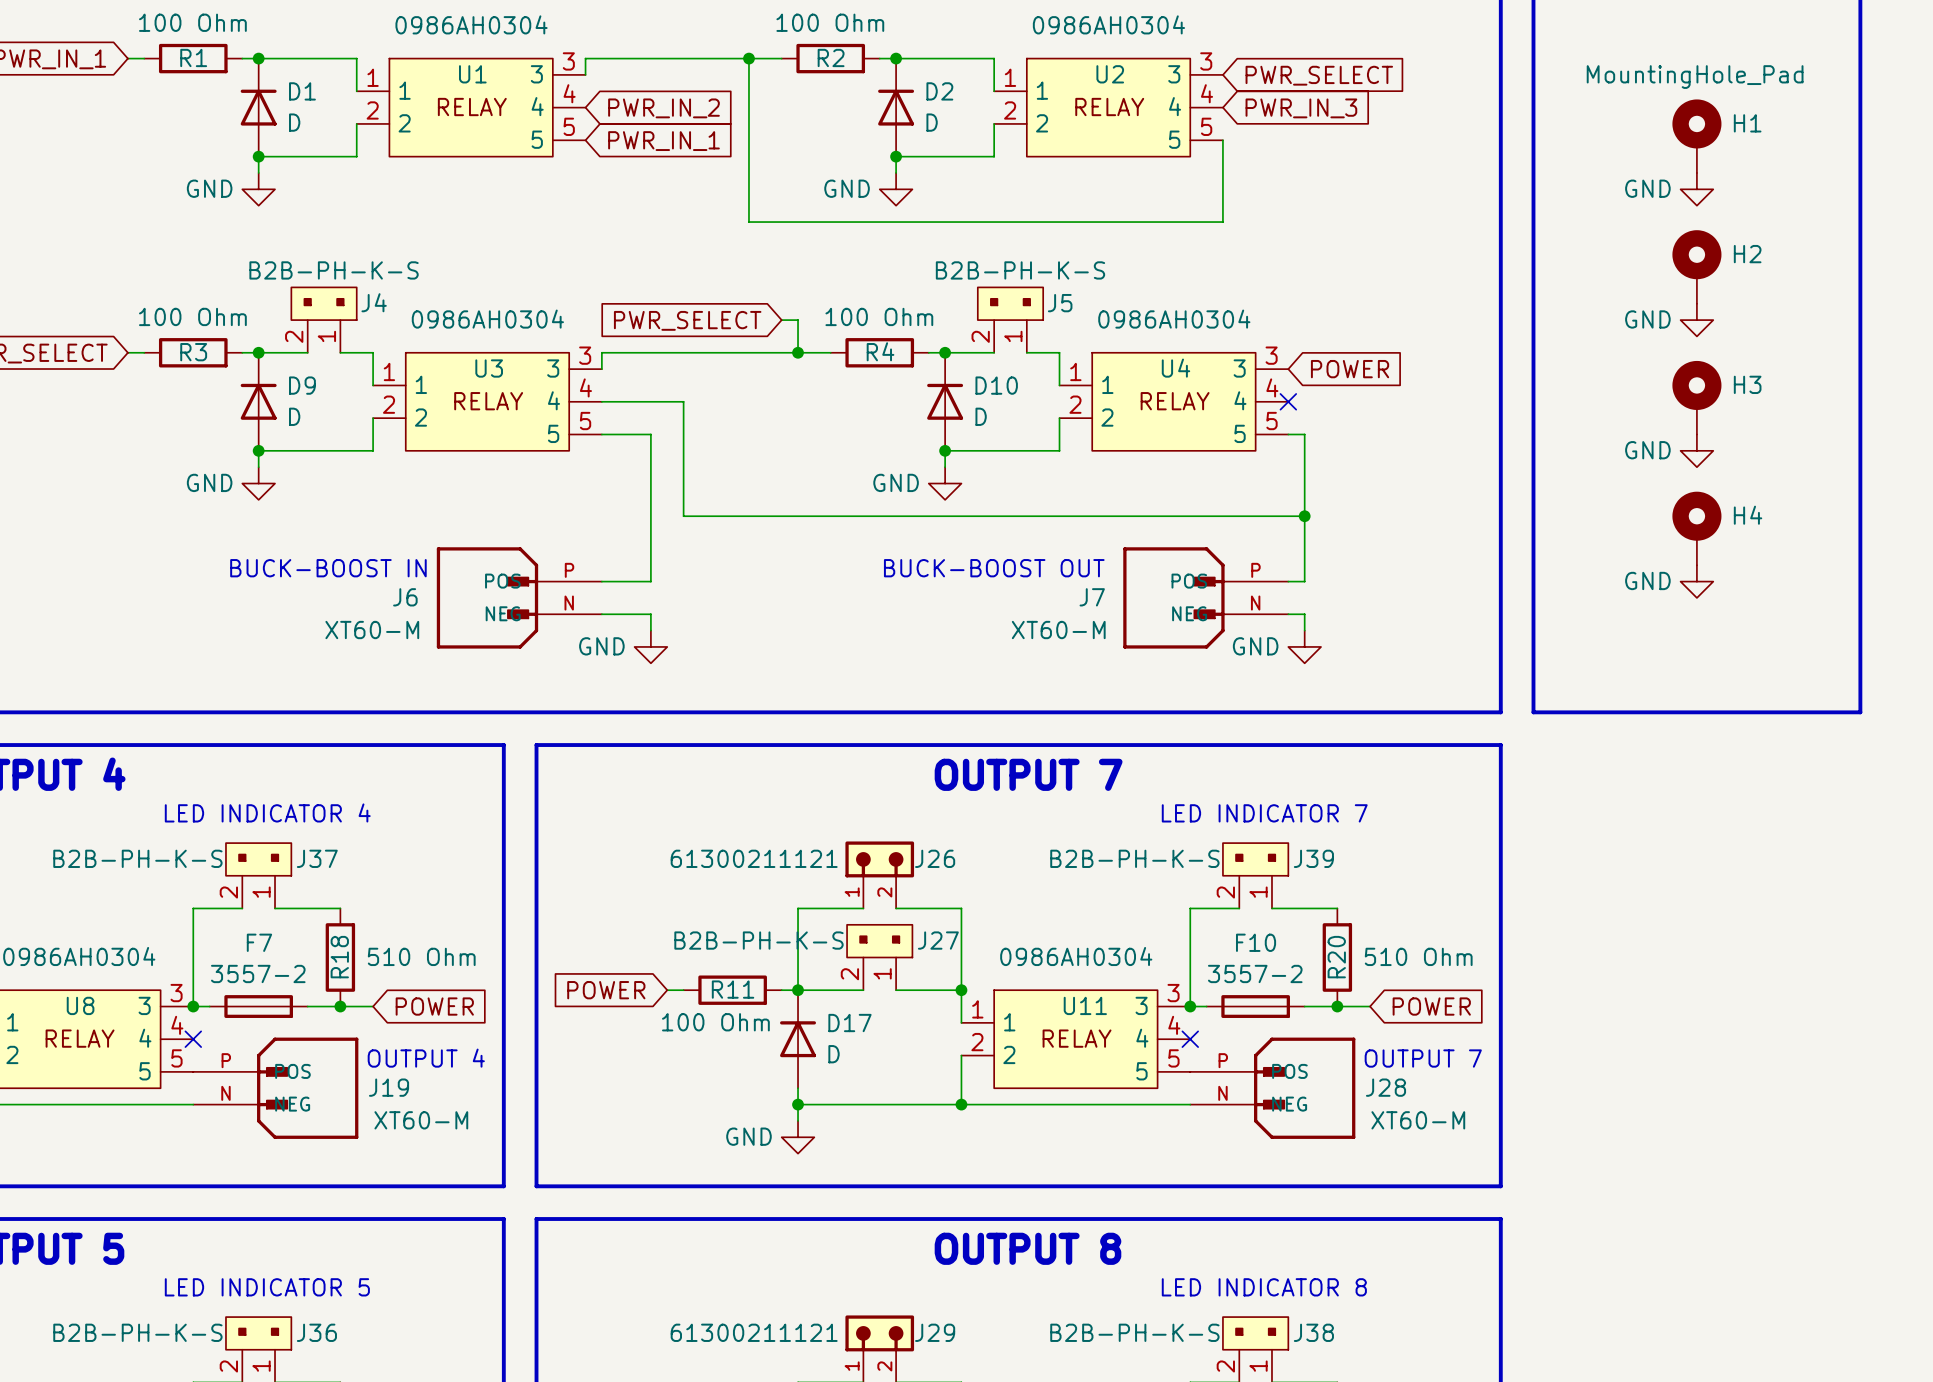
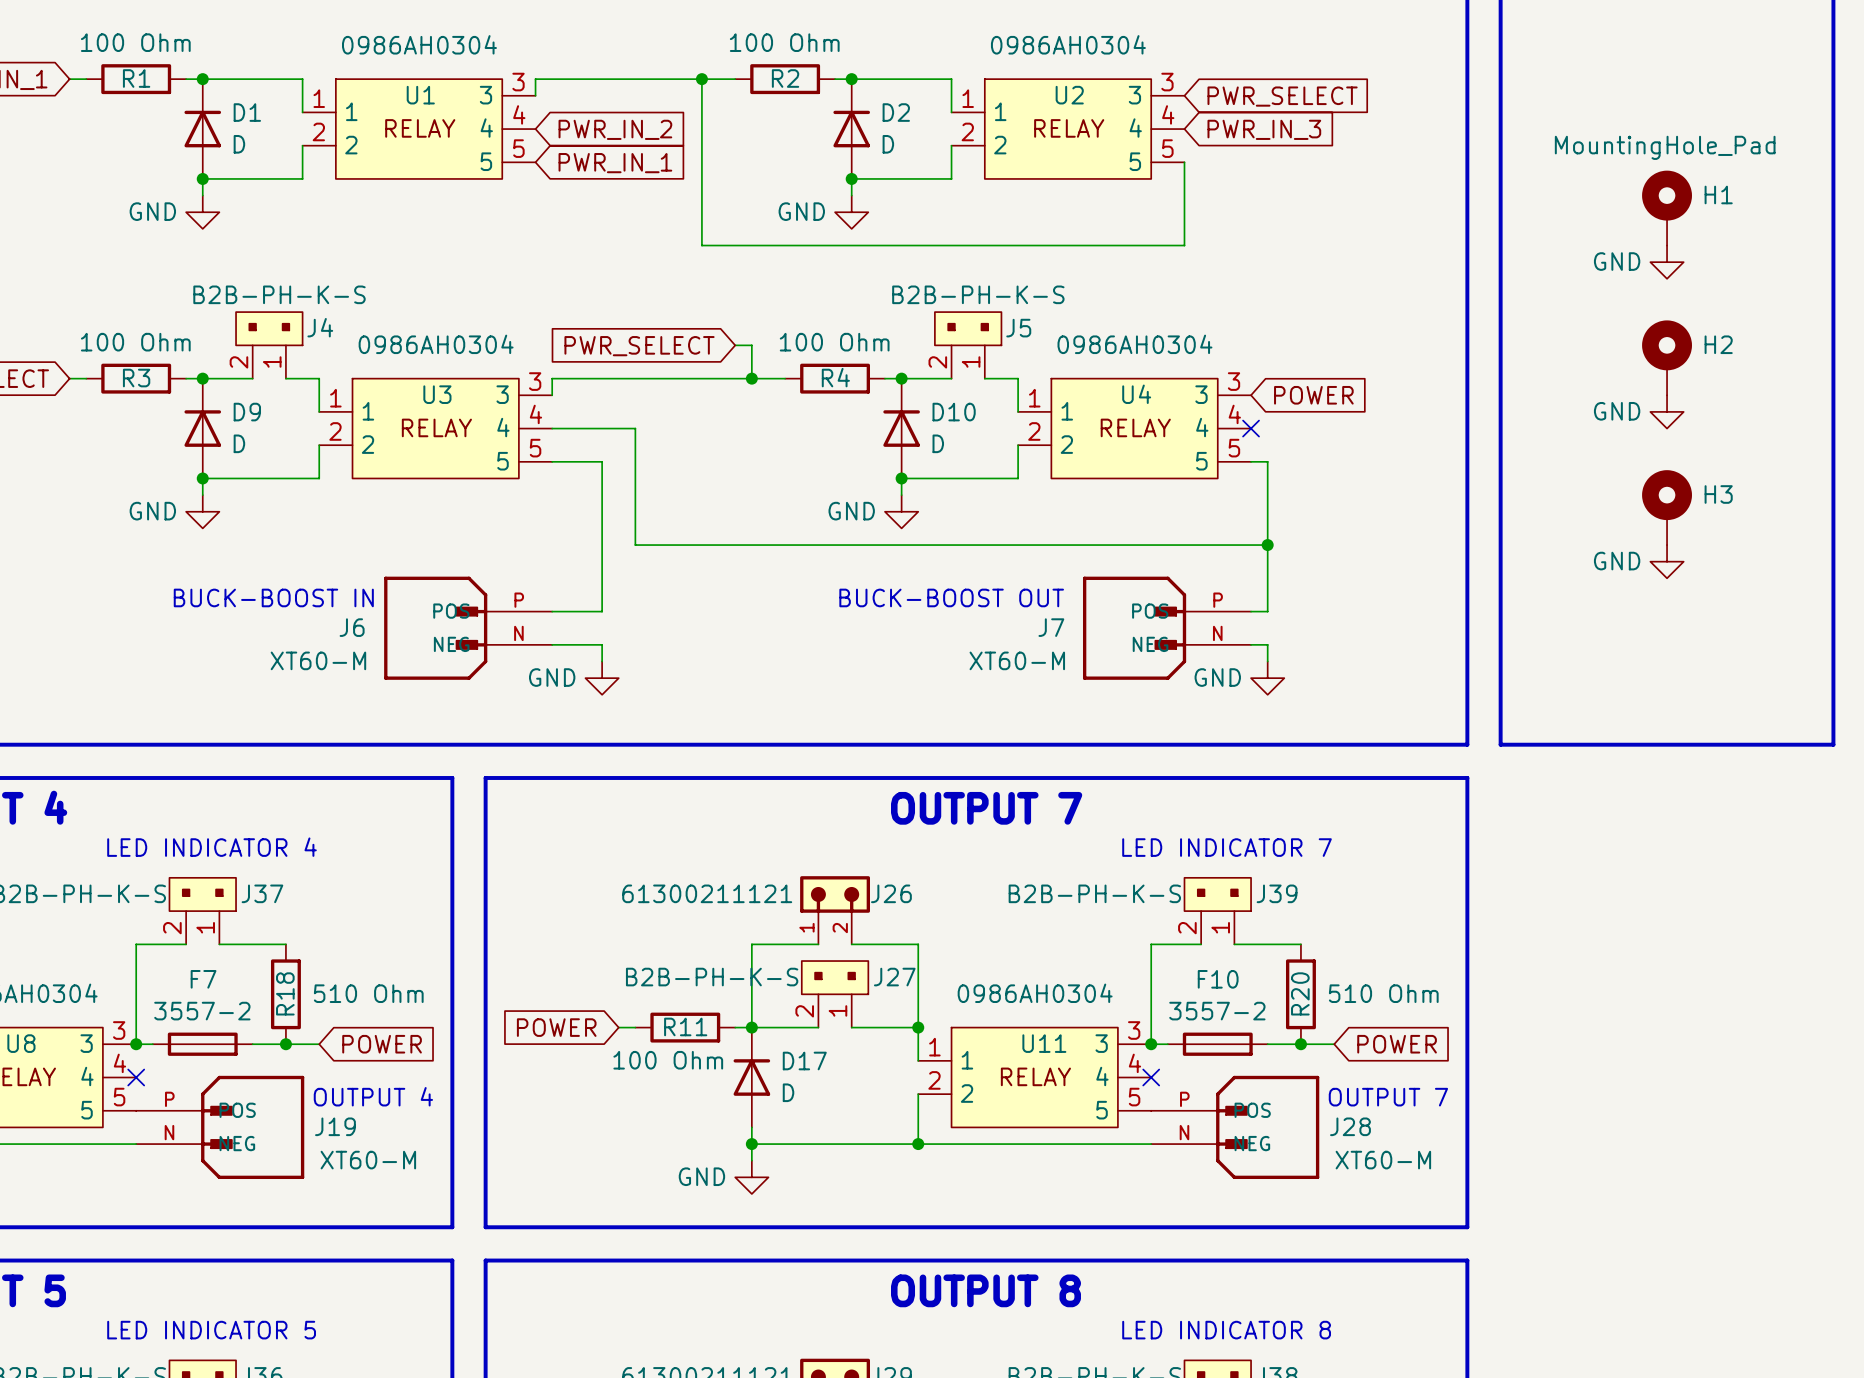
H1 position: (1696, 136) -> (1667, 208)
power symbol: GND (1696, 189) -> none
power symbol: none -> GND (1667, 262)
H2 position: (1696, 266) -> (1667, 357)
power symbol: GND (1696, 320) -> none
power symbol: none -> GND (1667, 411)
H3 position: (1696, 397) -> (1667, 507)
power symbol: GND (1696, 450) -> none
H4: (1696, 528) -> none
power symbol: none -> GND (1667, 561)
power symbol: GND (1696, 581) -> none

